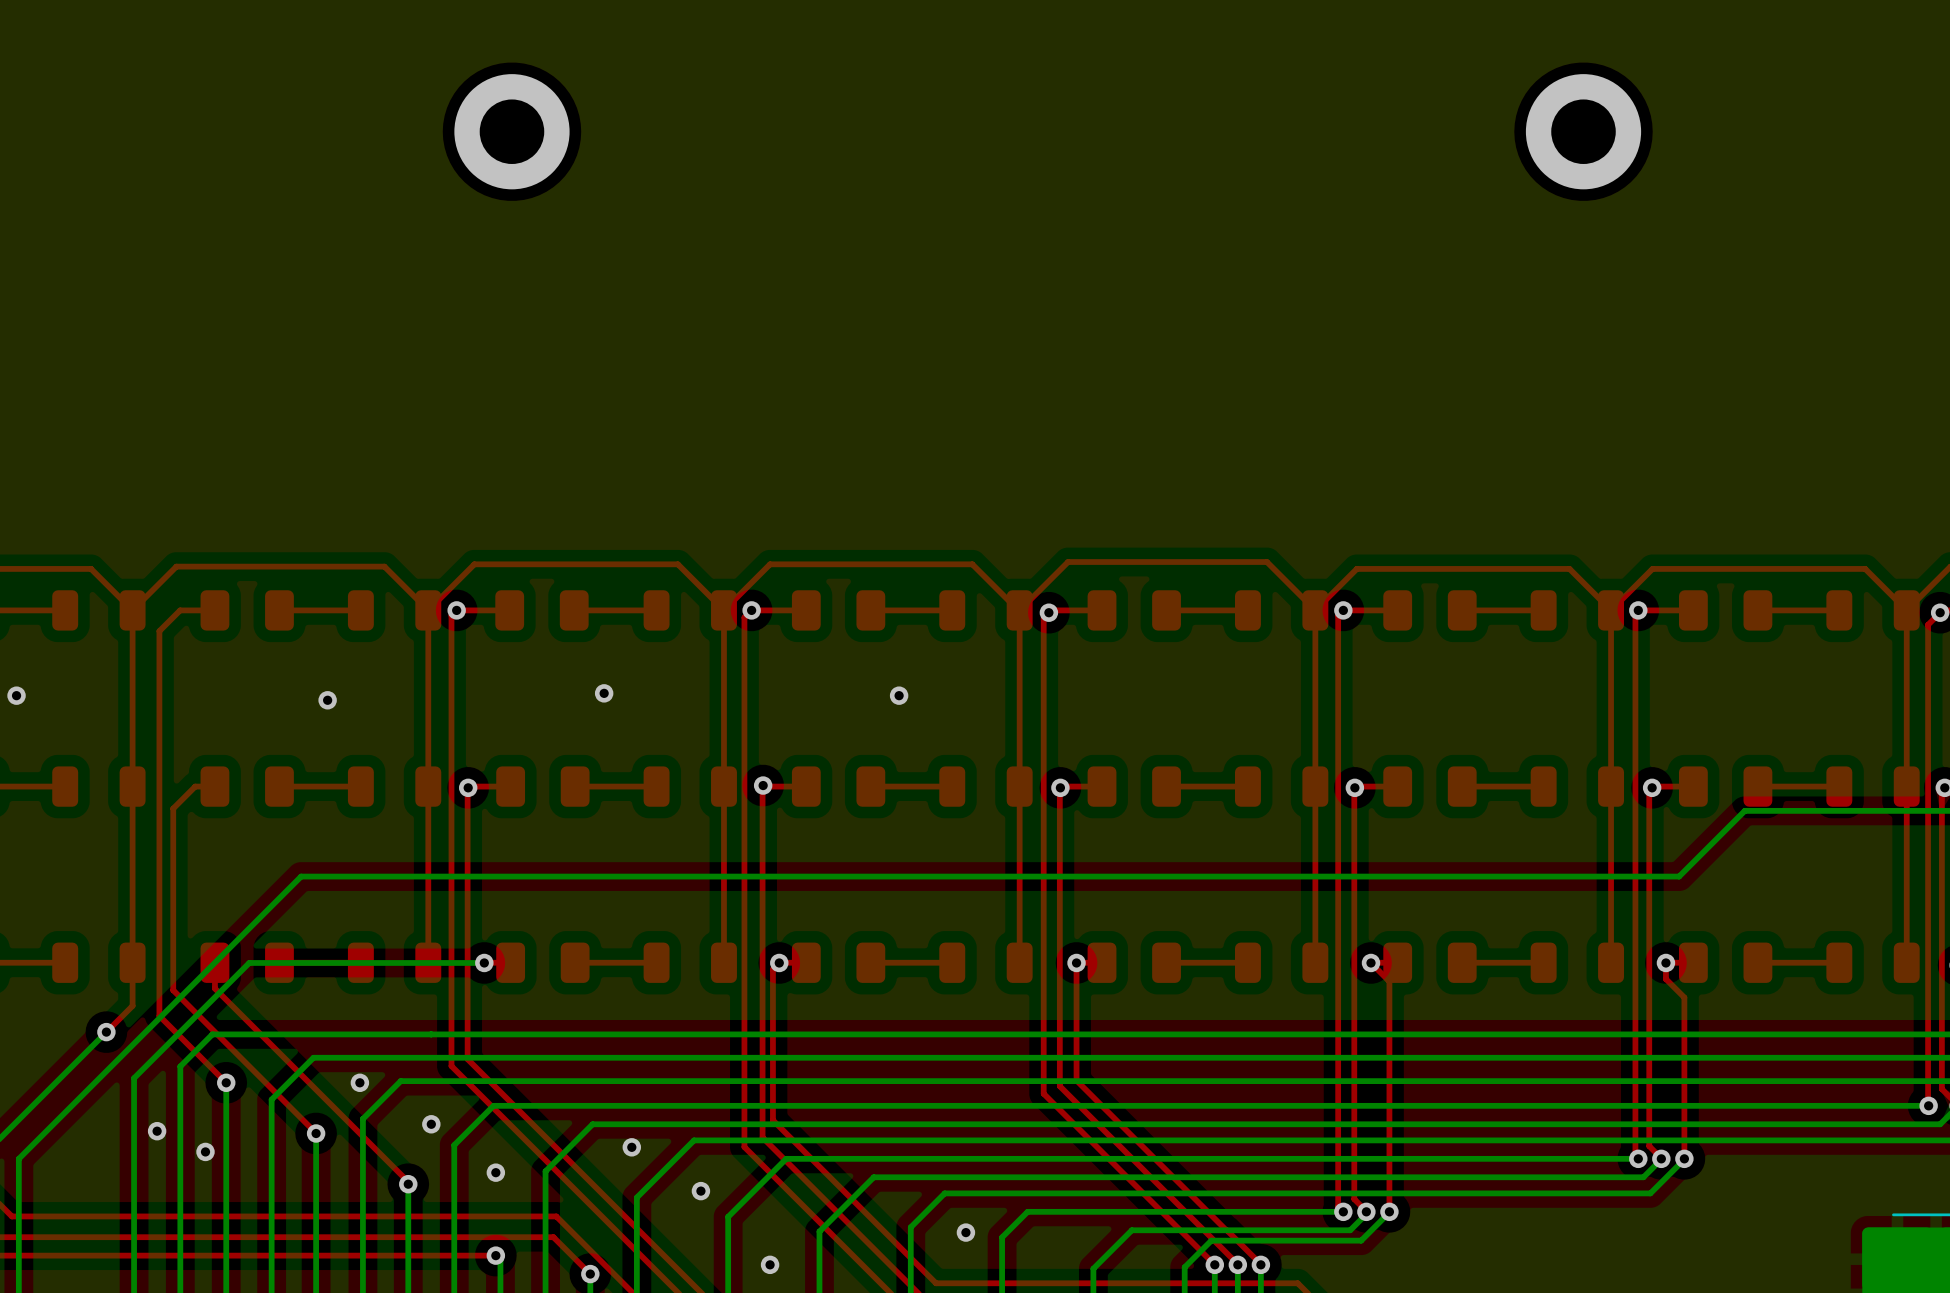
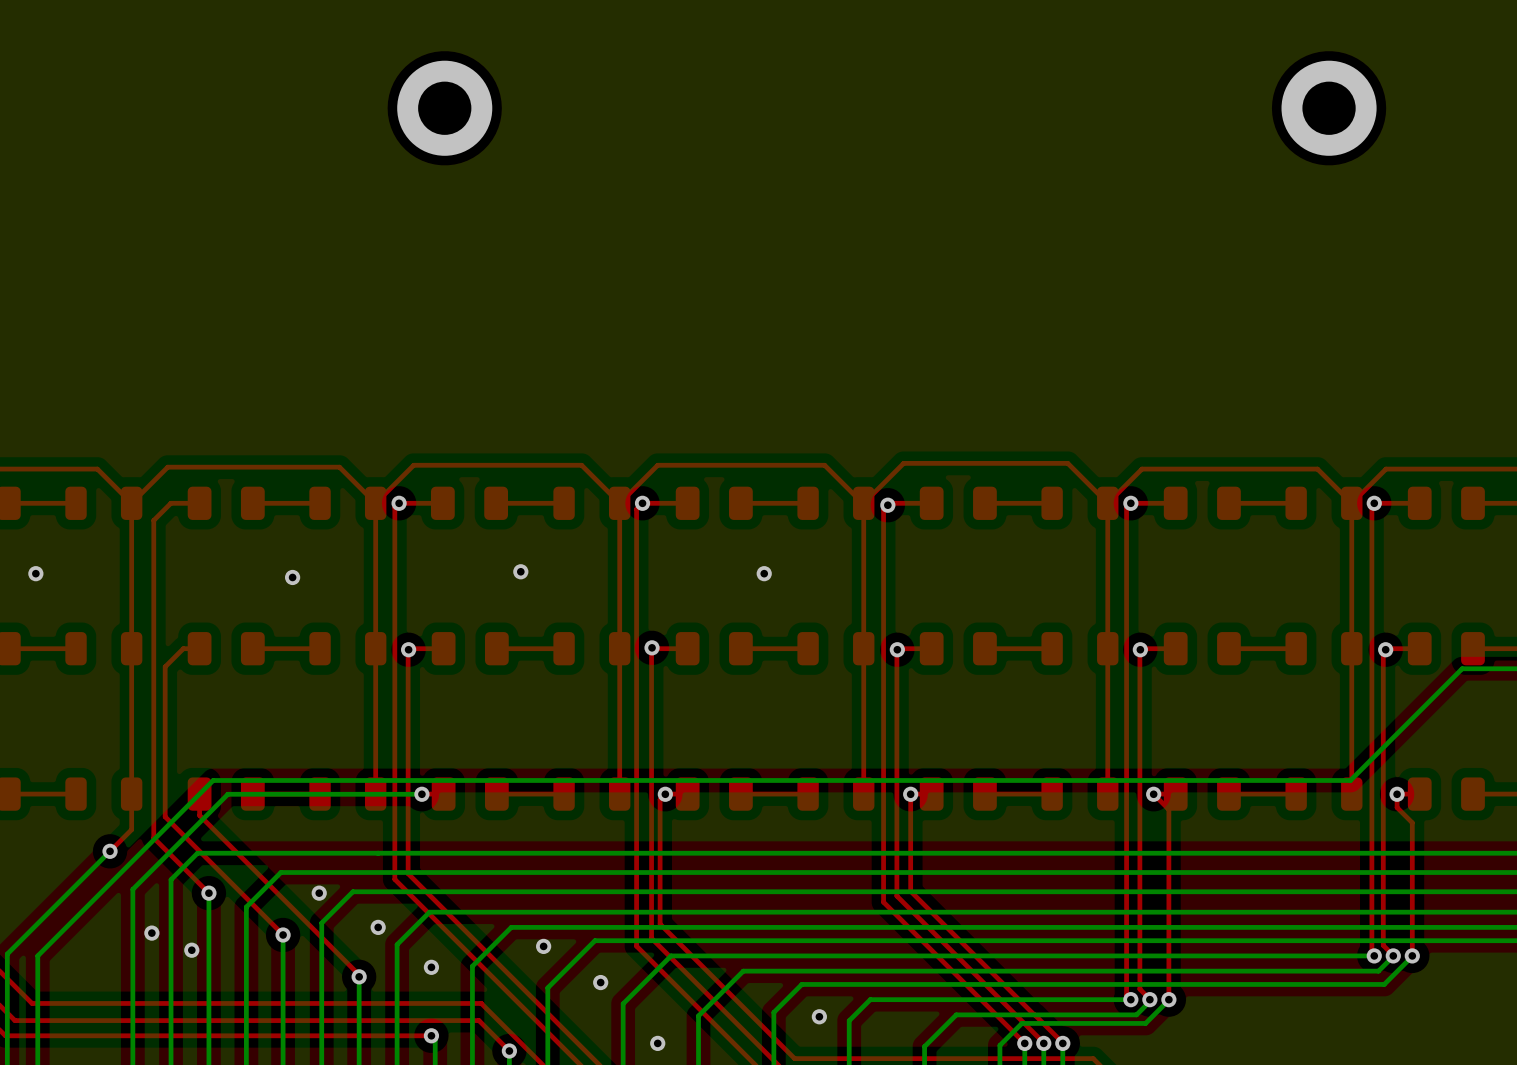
bottom track: (1679, 876) (301, 876) (231, 946) -> (1407, 722) (1350, 780) (213, 780)

